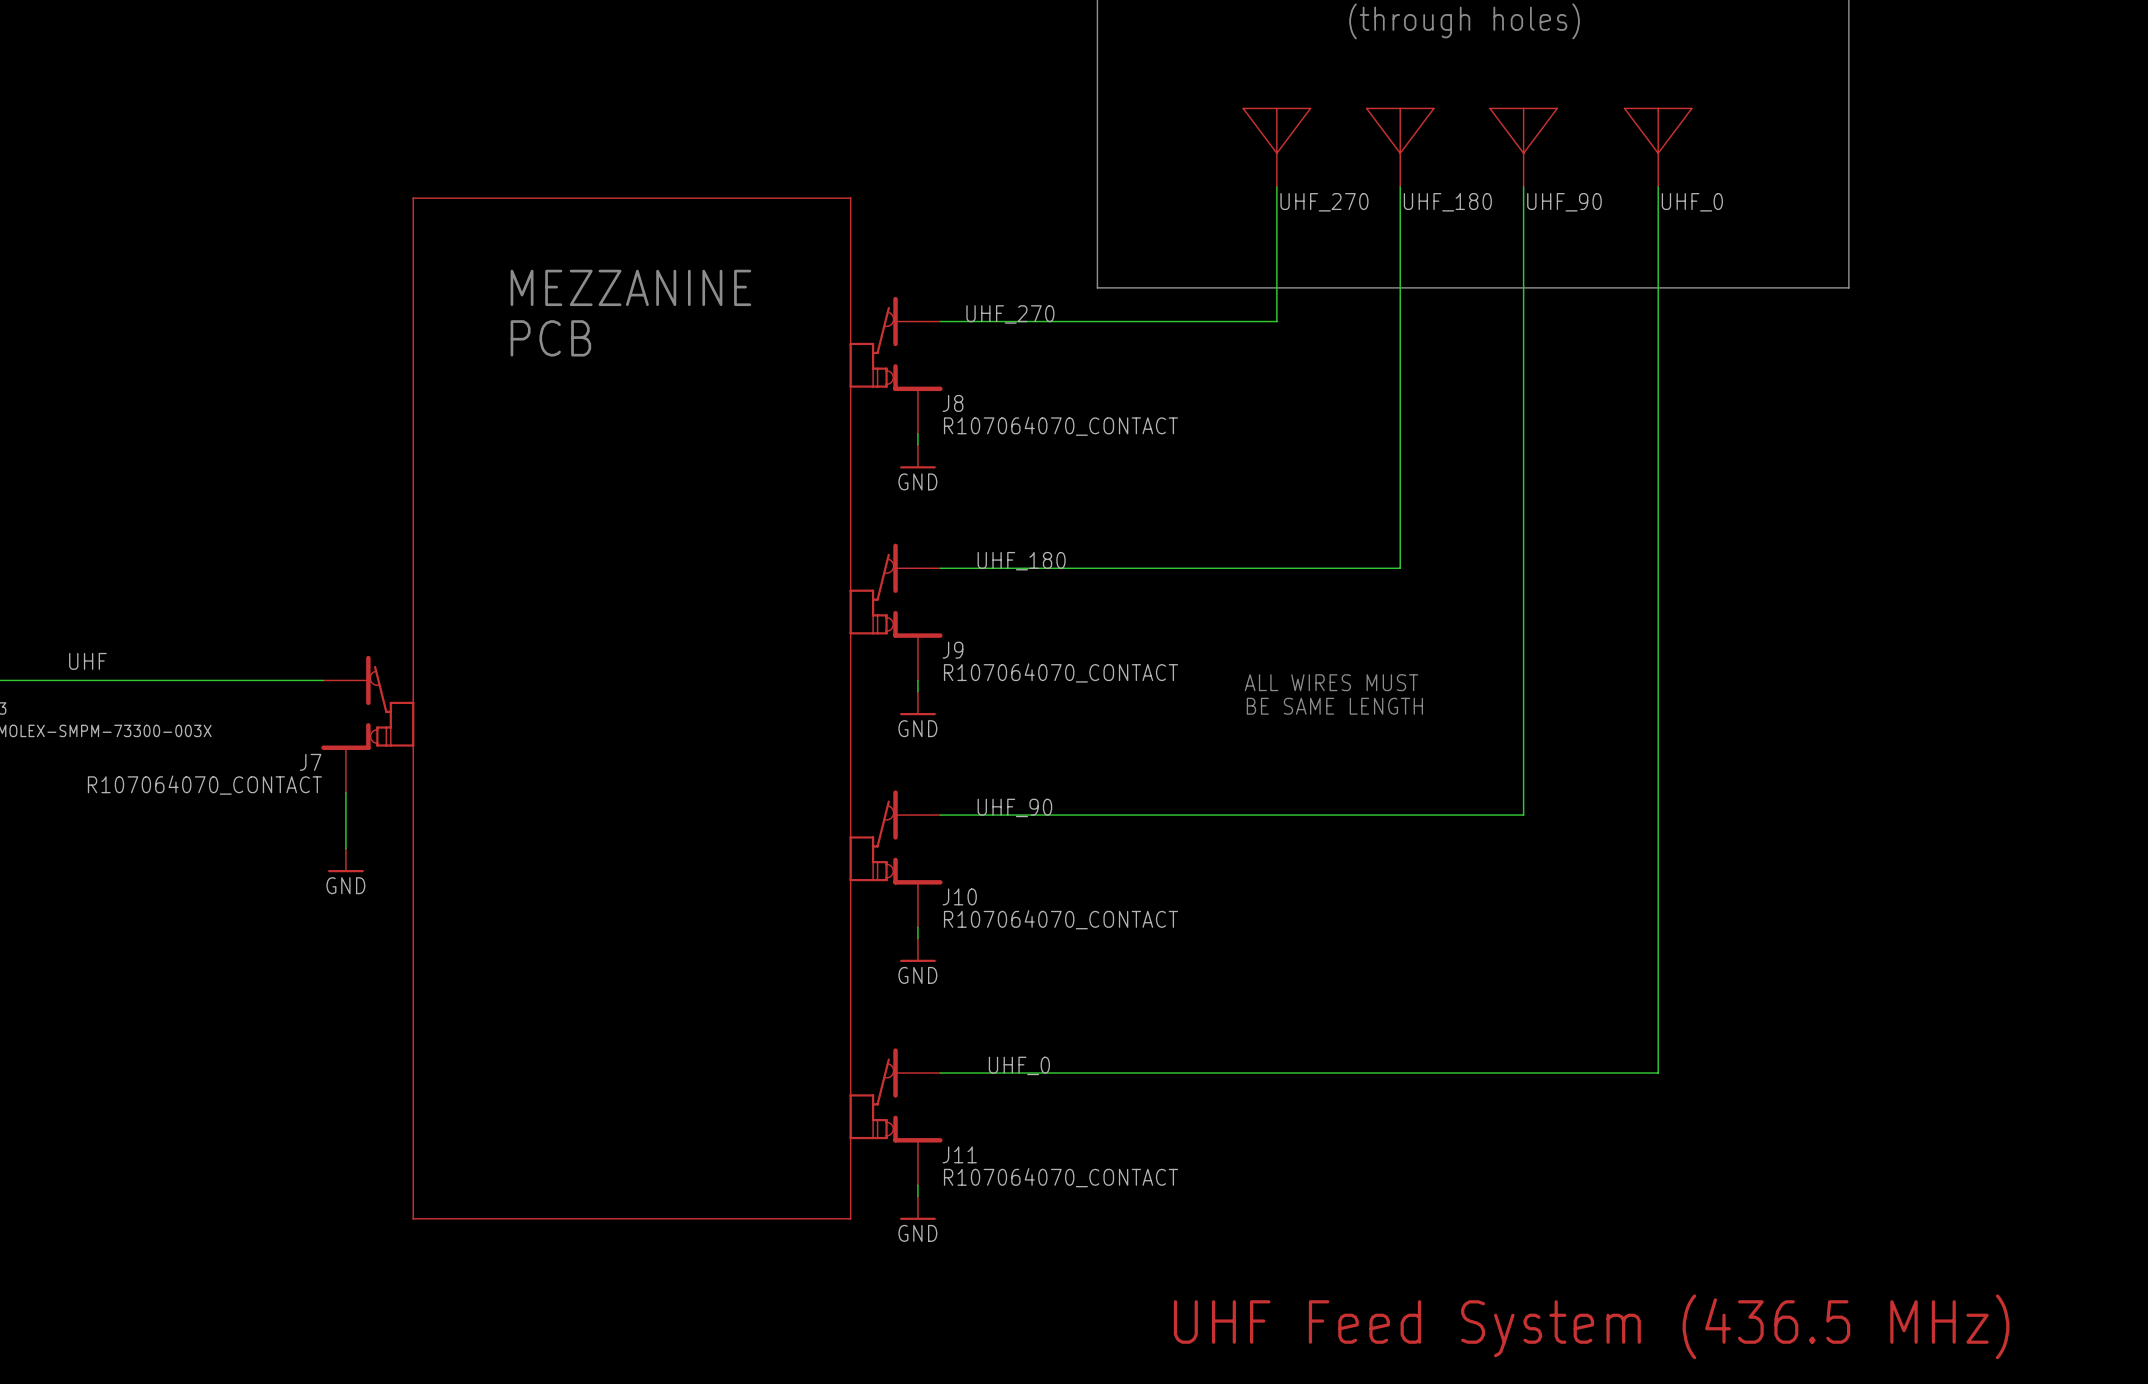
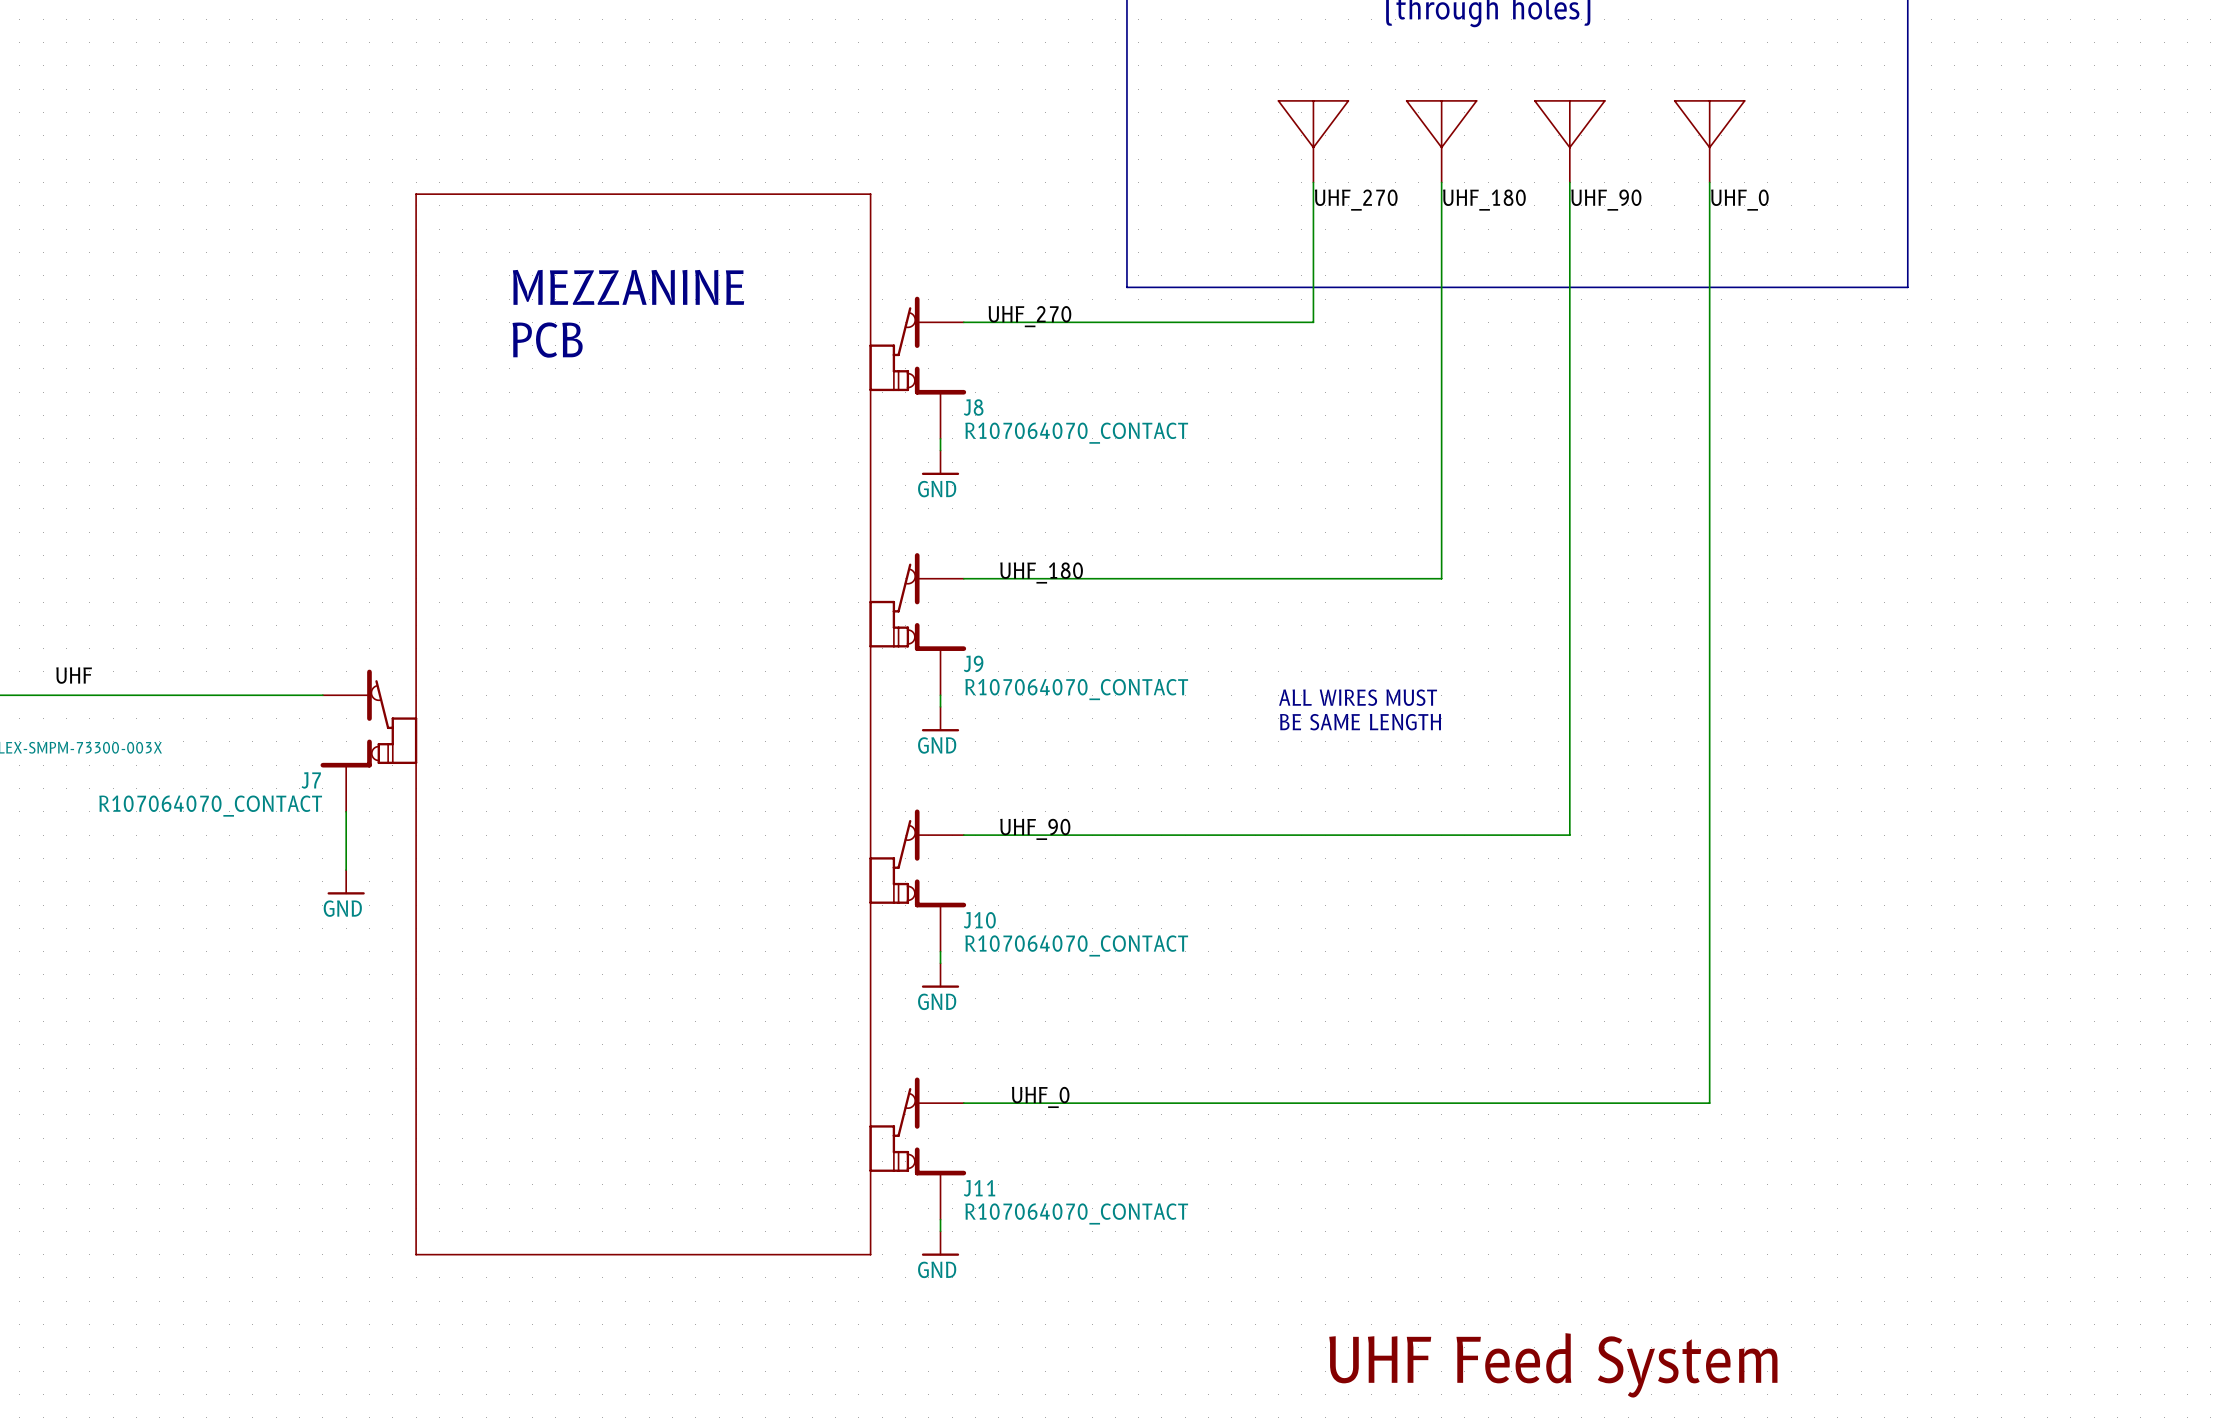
text: UHF Feed System (436.5 MHz) (1591, 1326) -> UHF Feed System (1553, 1365)

